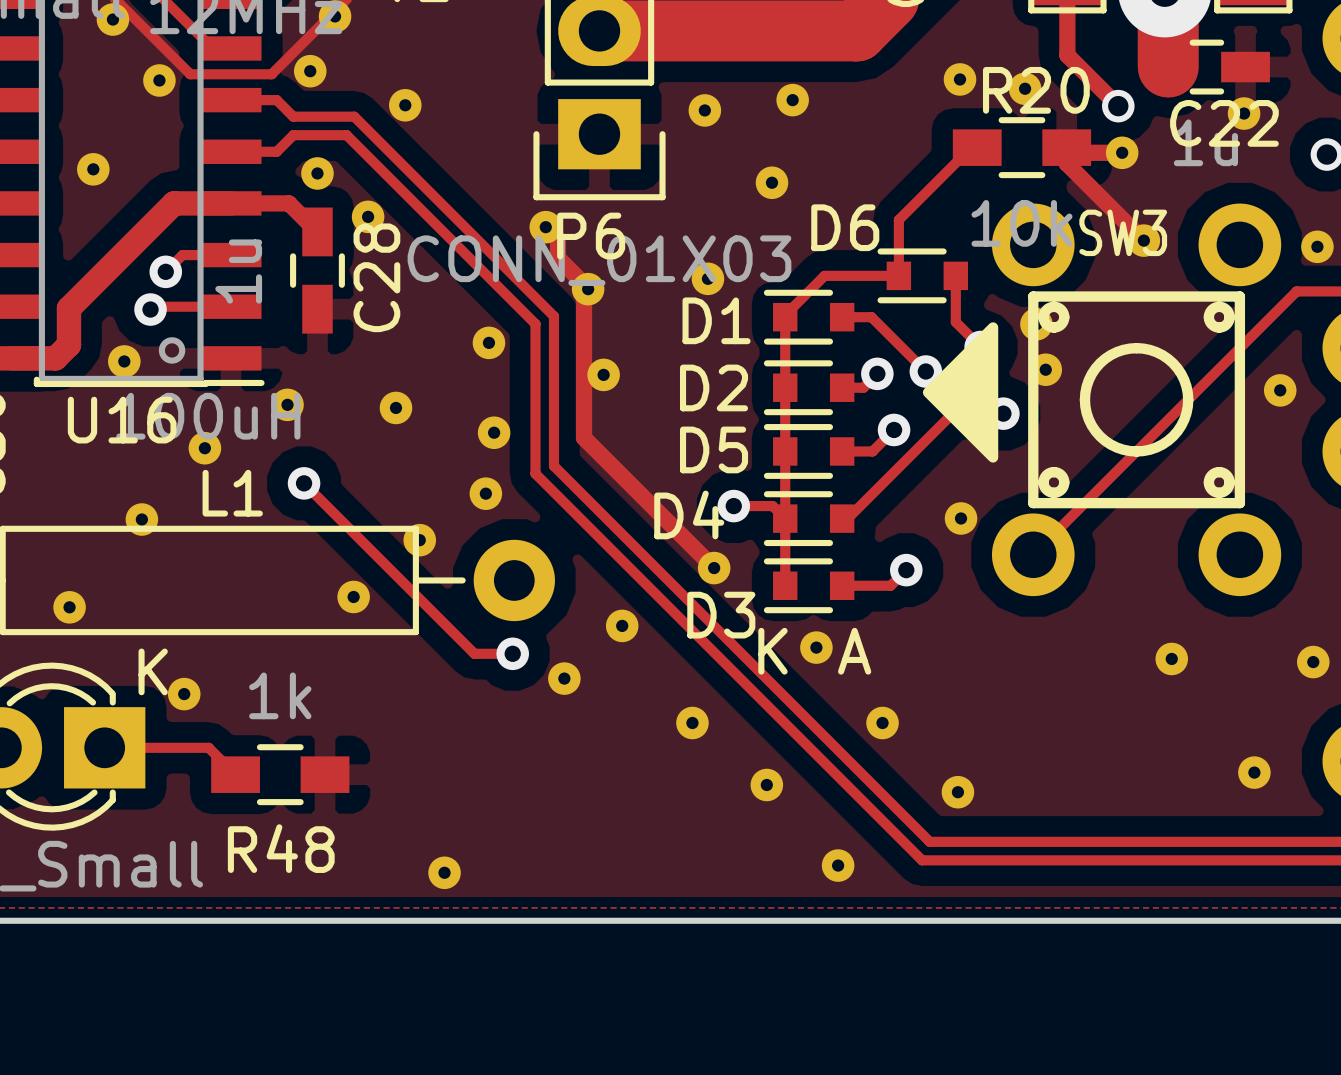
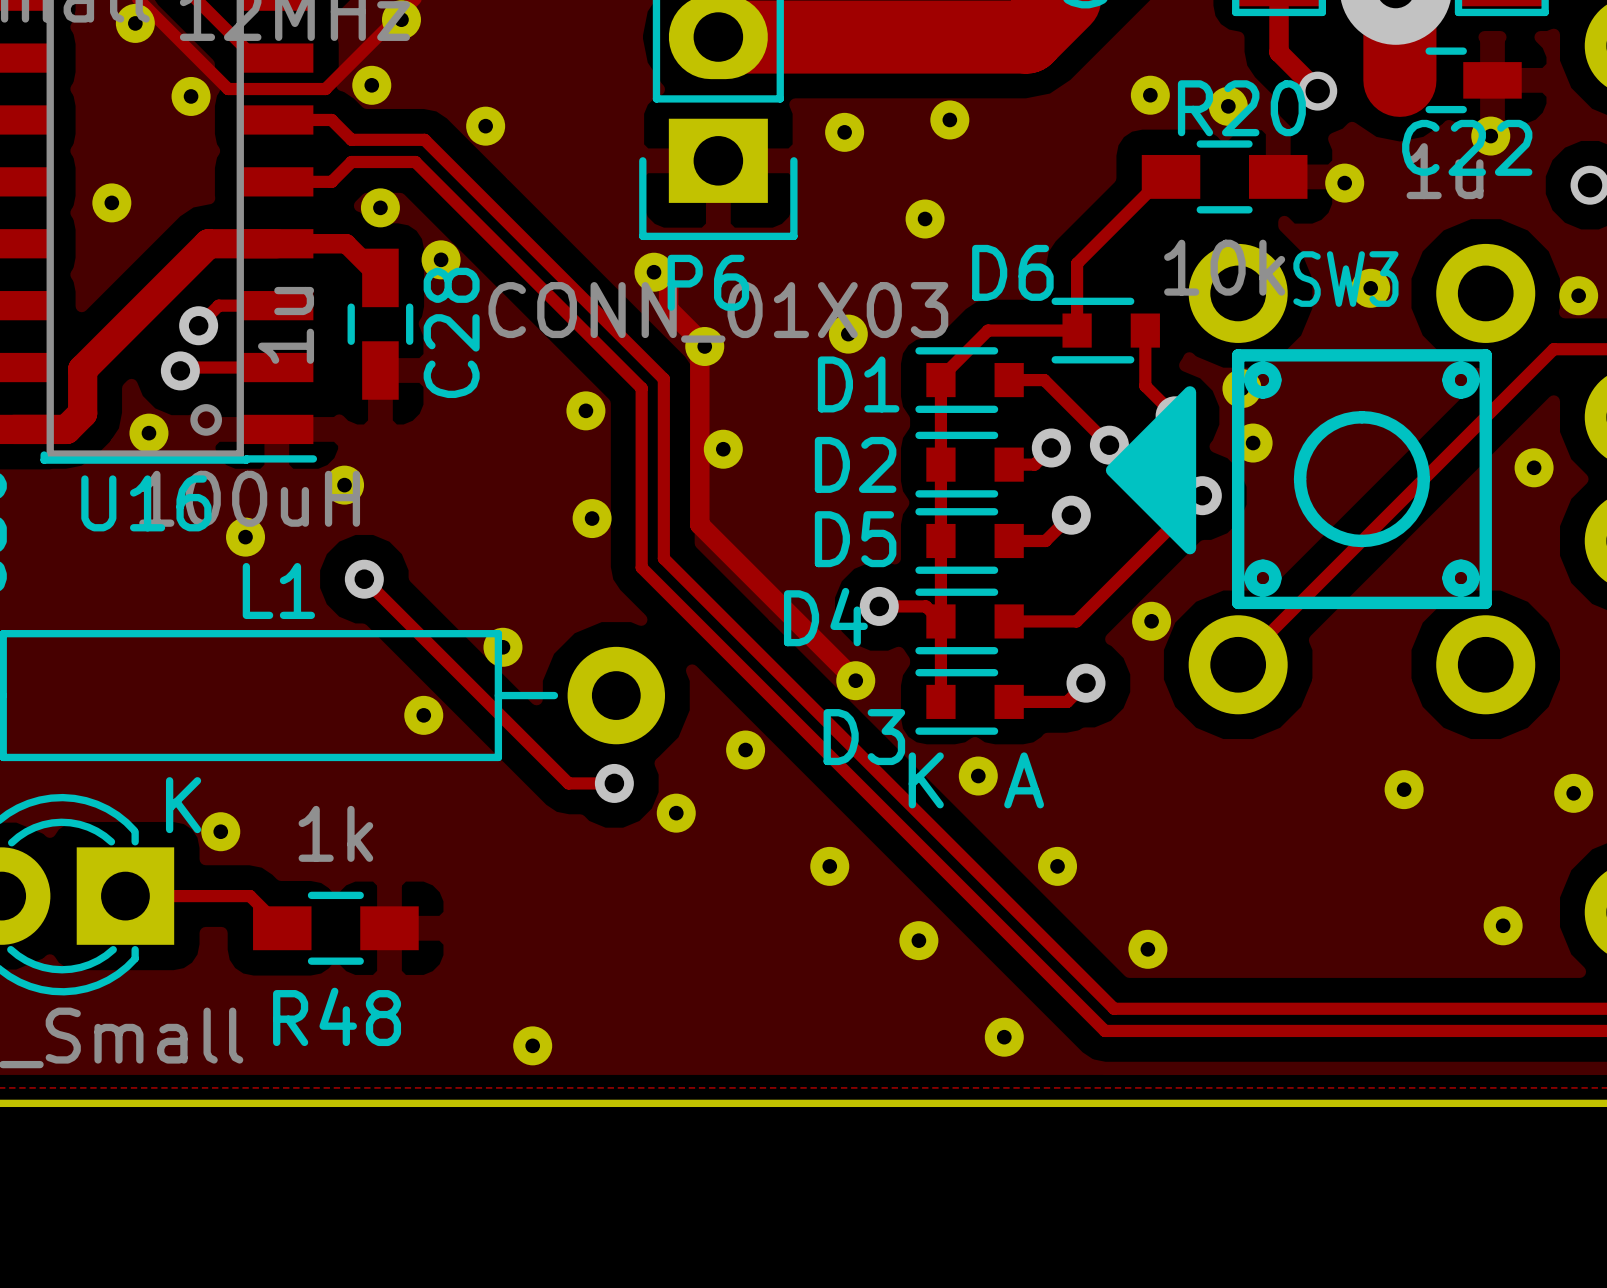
track: (1067, 43) (1067, 55) (1118, 106) -> (1279, 52) (1317, 91)
via position: (1118, 106) -> (1317, 91)
track: (1122, 152) (1071, 152) (1066, 147) (1066, 163) (1143, 240) -> none
part: (395, 407) -> none
track: (1003, 413) (952, 413) (847, 518) -> (1202, 495) (1076, 621) (1015, 621)
part: (485, 493) -> none
part: (141, 519) -> none
part: (69, 607) -> none

